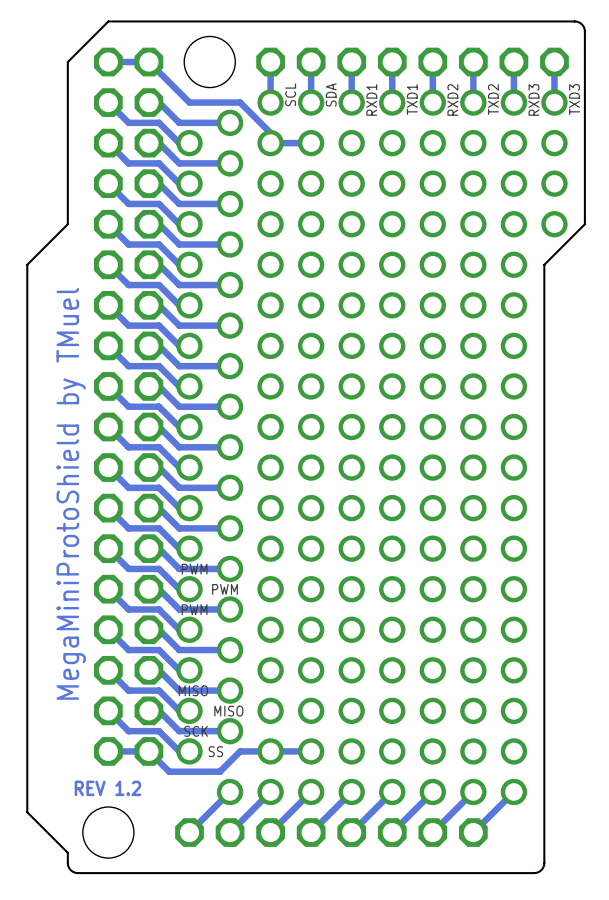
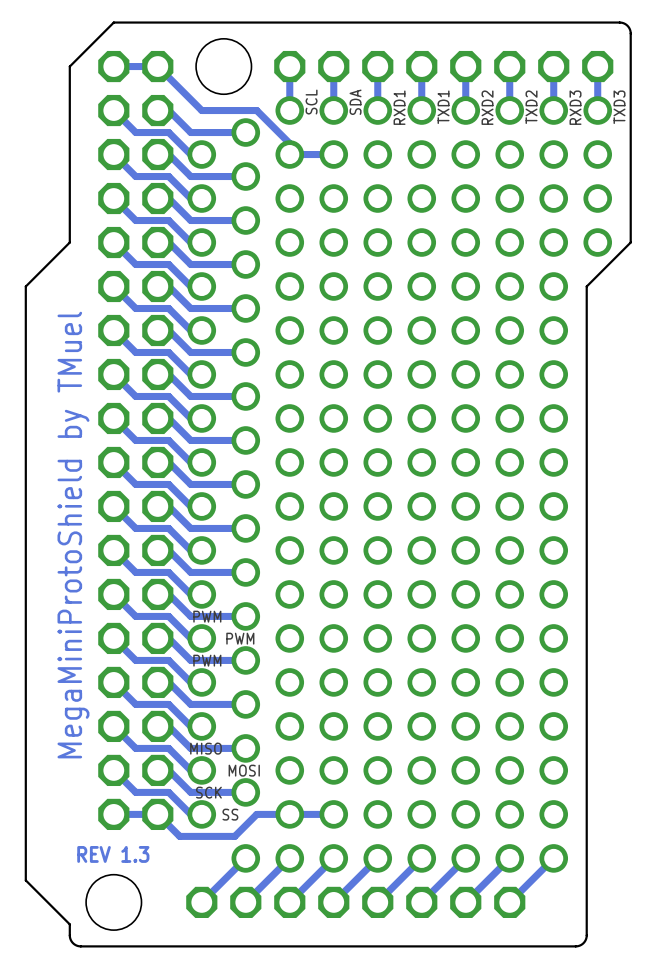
text: MISO (228, 711) -> MOSI (244, 770)
text: REV 1.2 (107, 788) -> REV 1.3 (113, 854)

